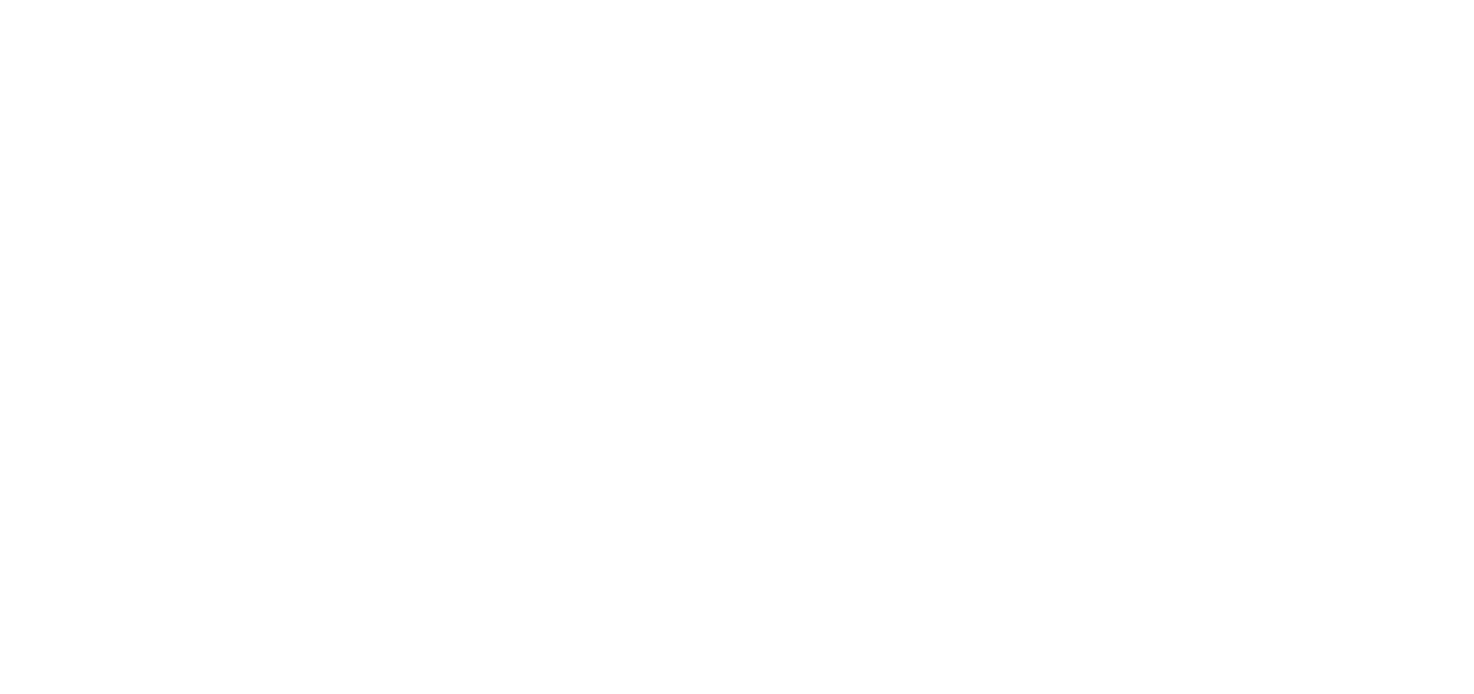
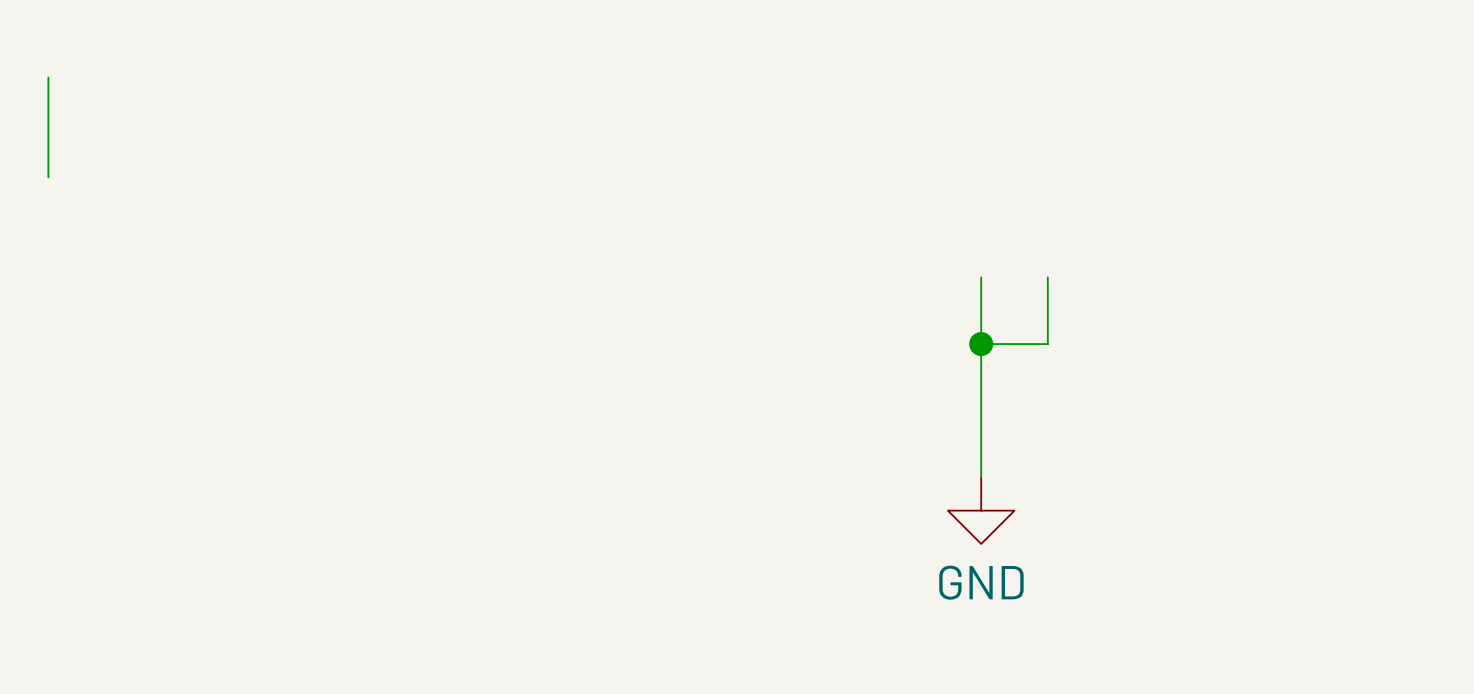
wire: none -> (48, 77) (48, 177)
wire: none -> (981, 277) (981, 477)
wire: none -> (1047, 277) (1047, 344) (981, 344)
junction: none -> (981, 344)
power symbol: none -> GND (981, 510)

